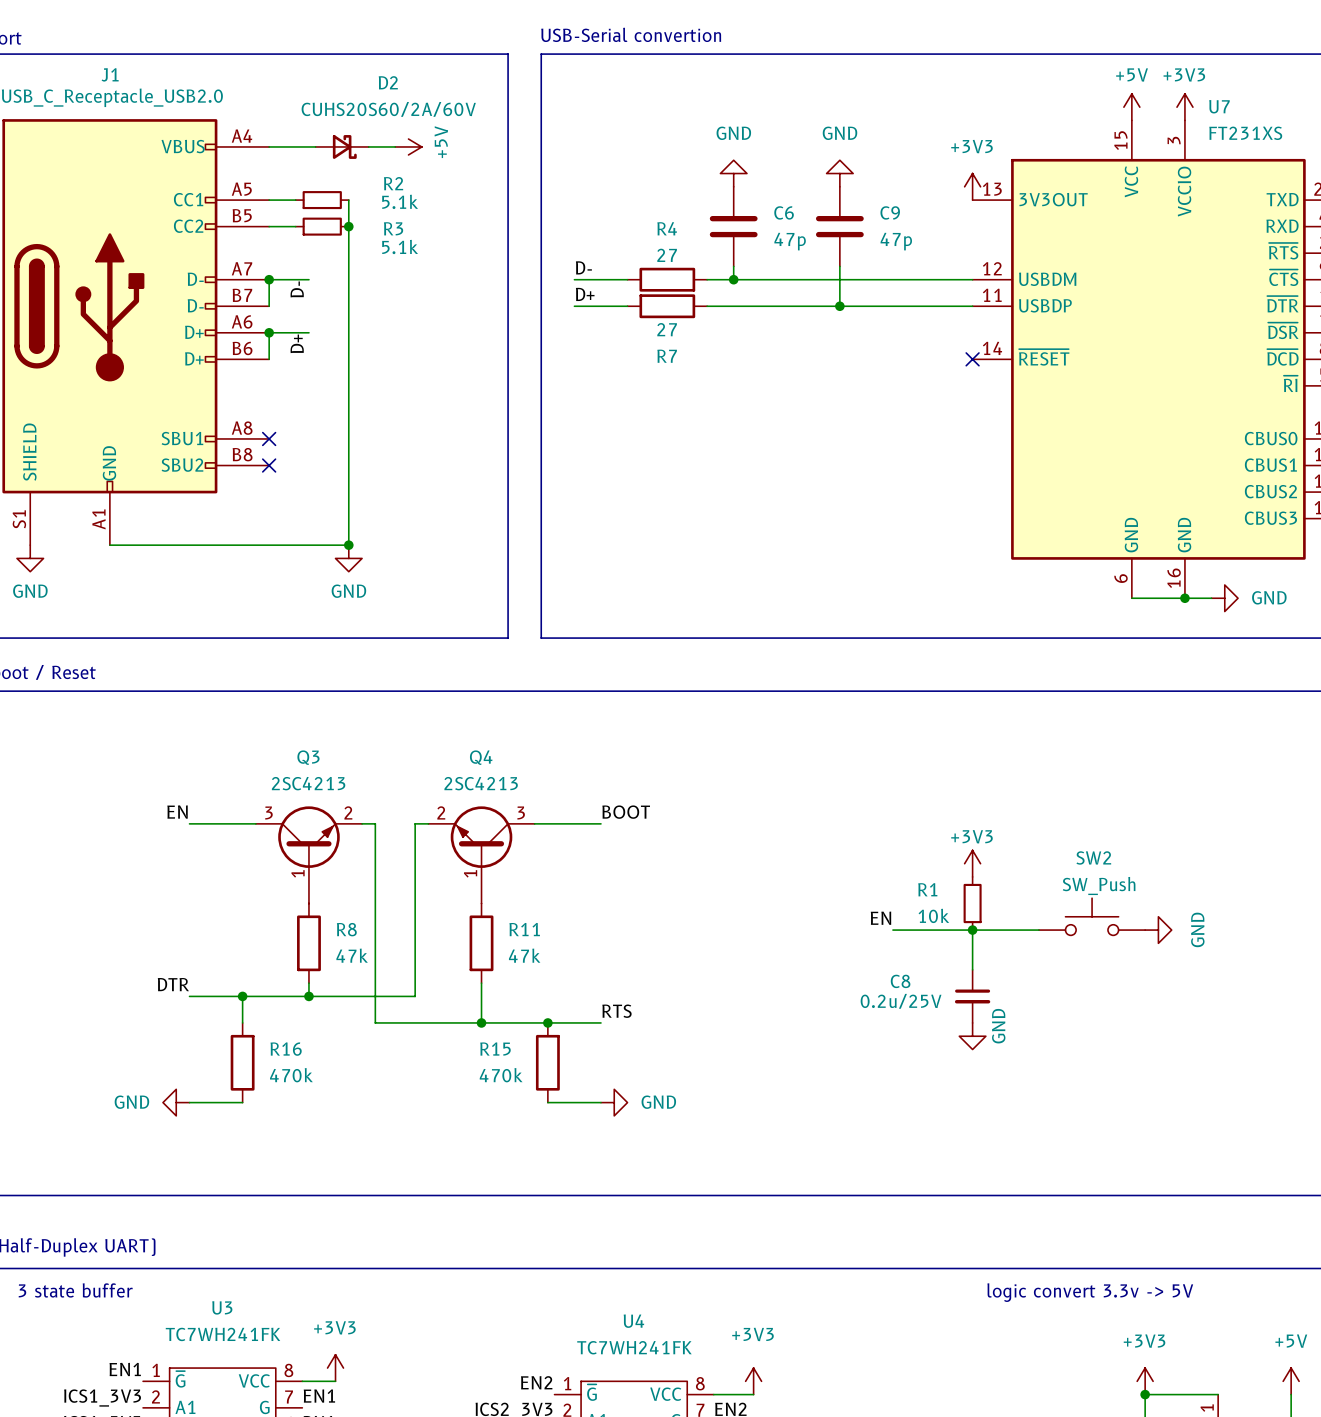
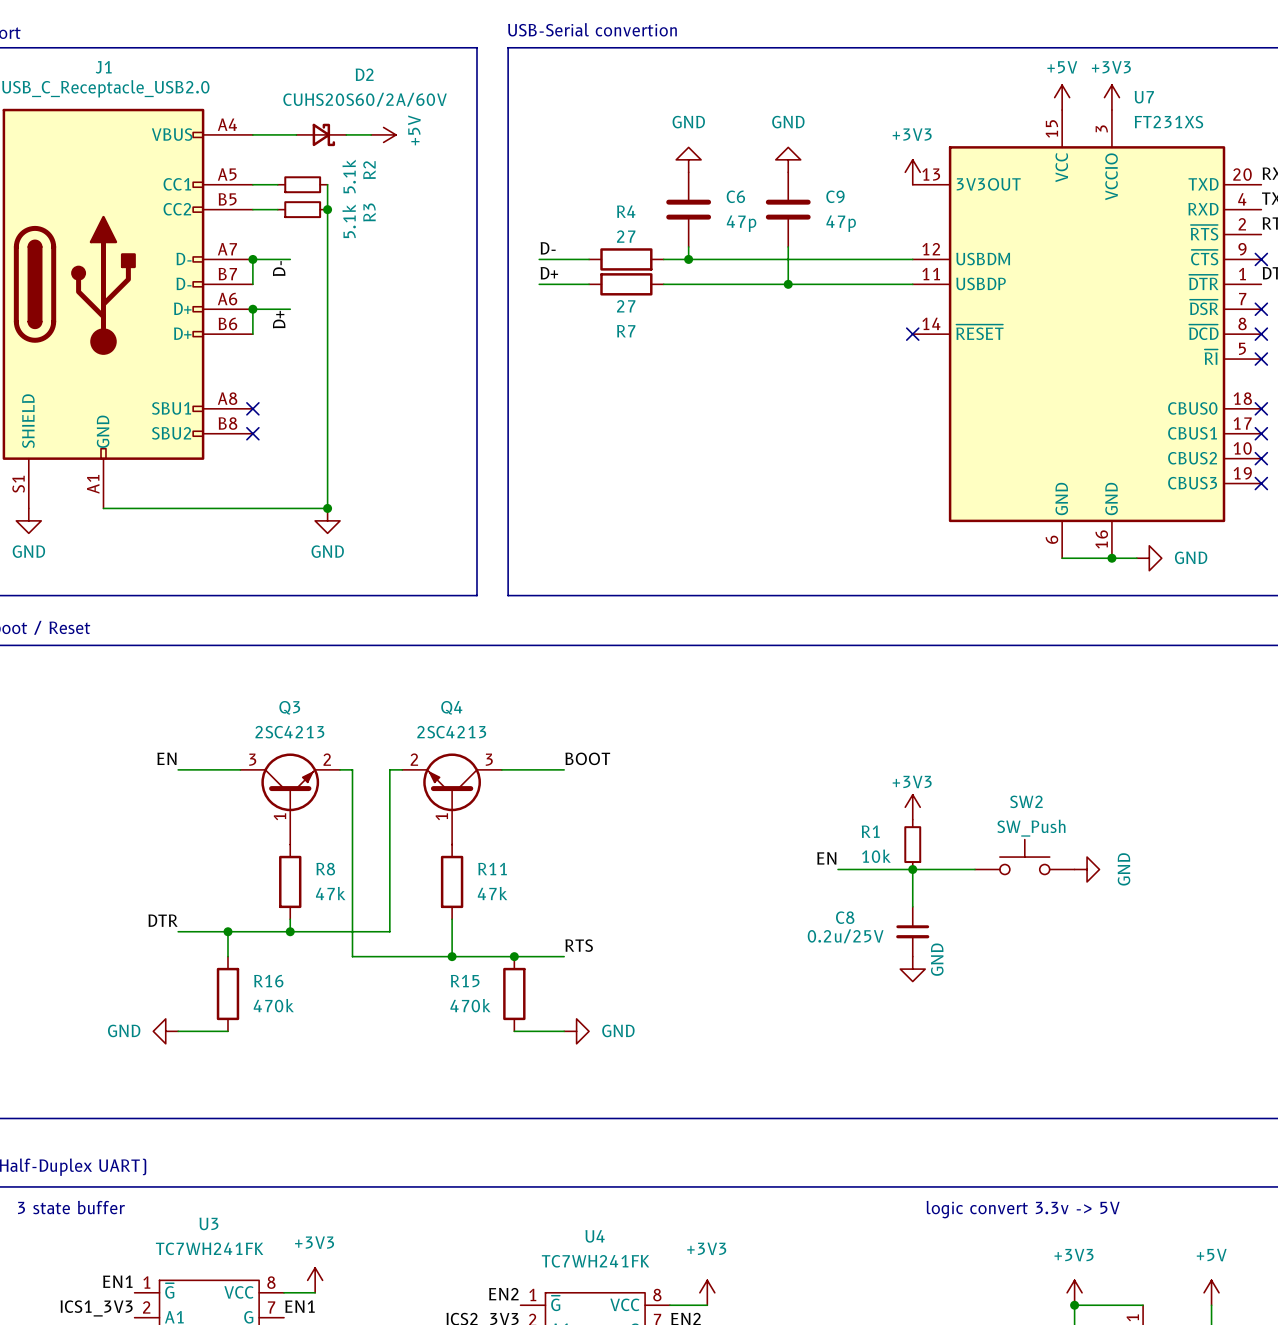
R2 name rotation: 0° (393, 183) -> 90° counterclockwise (369, 170)
R2 value rotation: 0° (400, 201) -> 90° counterclockwise (349, 176)
R3 name rotation: 0° (393, 228) -> 90° counterclockwise (369, 212)
R3 value rotation: 0° (400, 246) -> 90° counterclockwise (349, 221)

